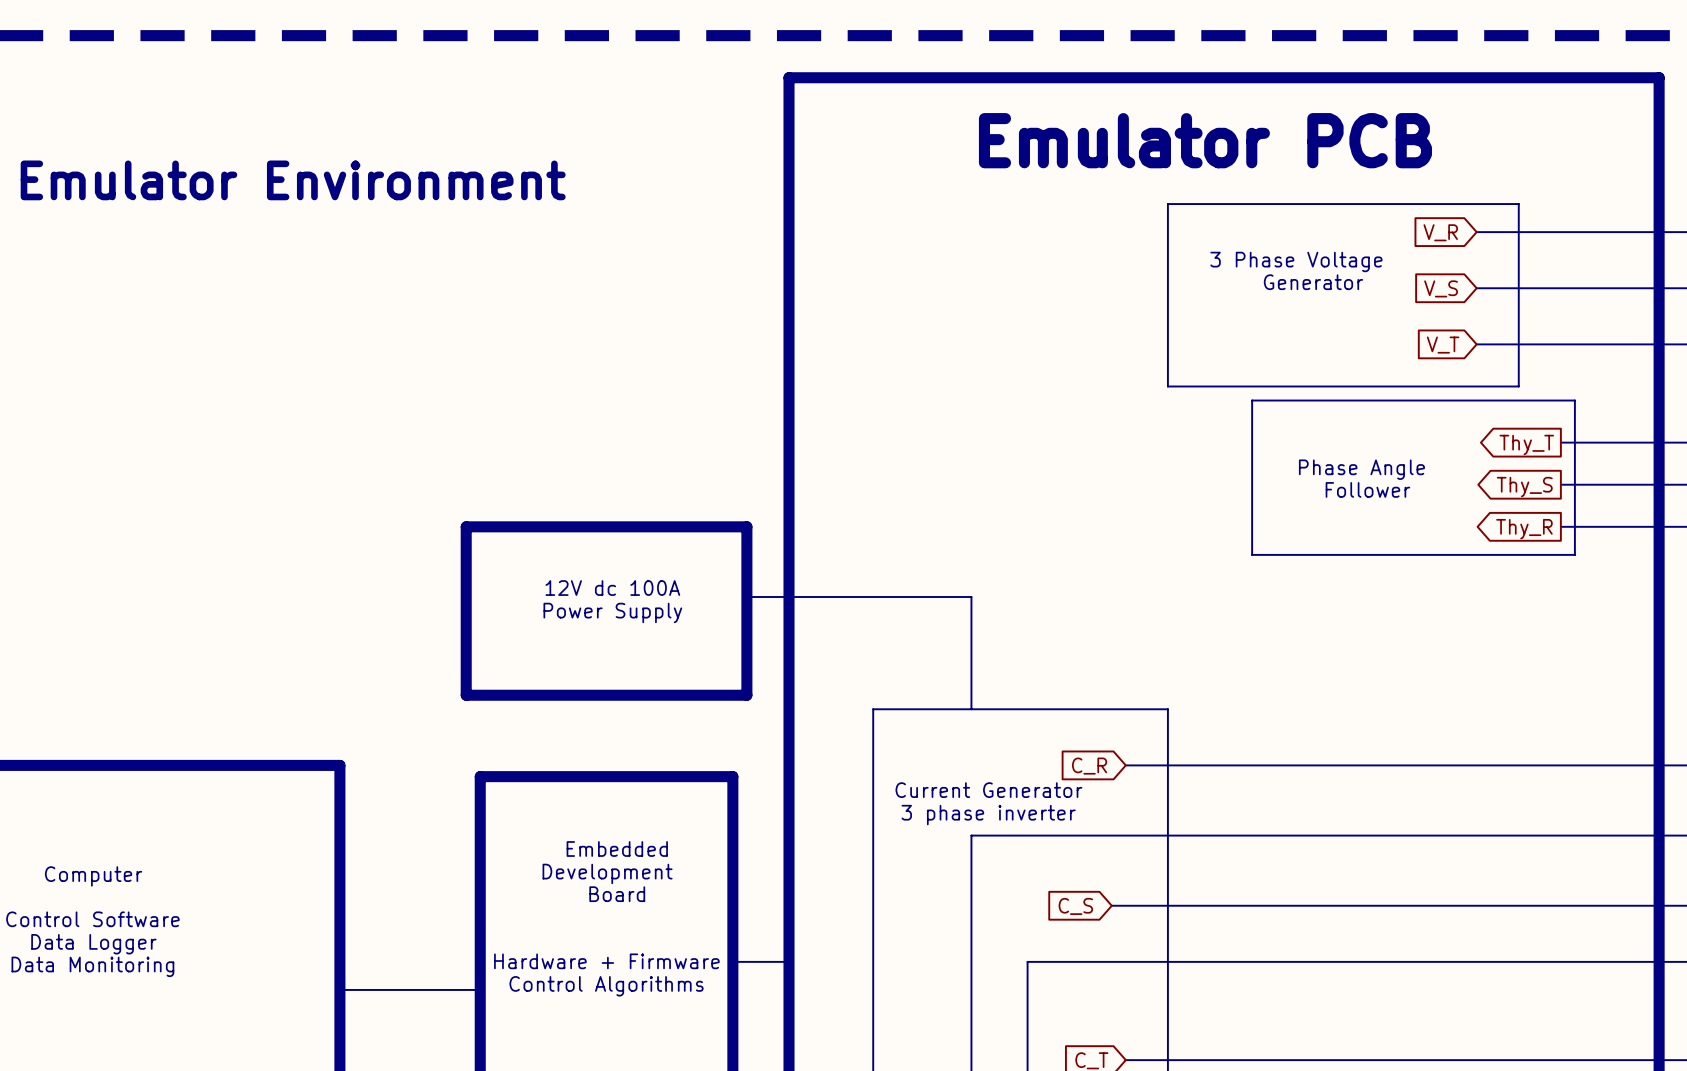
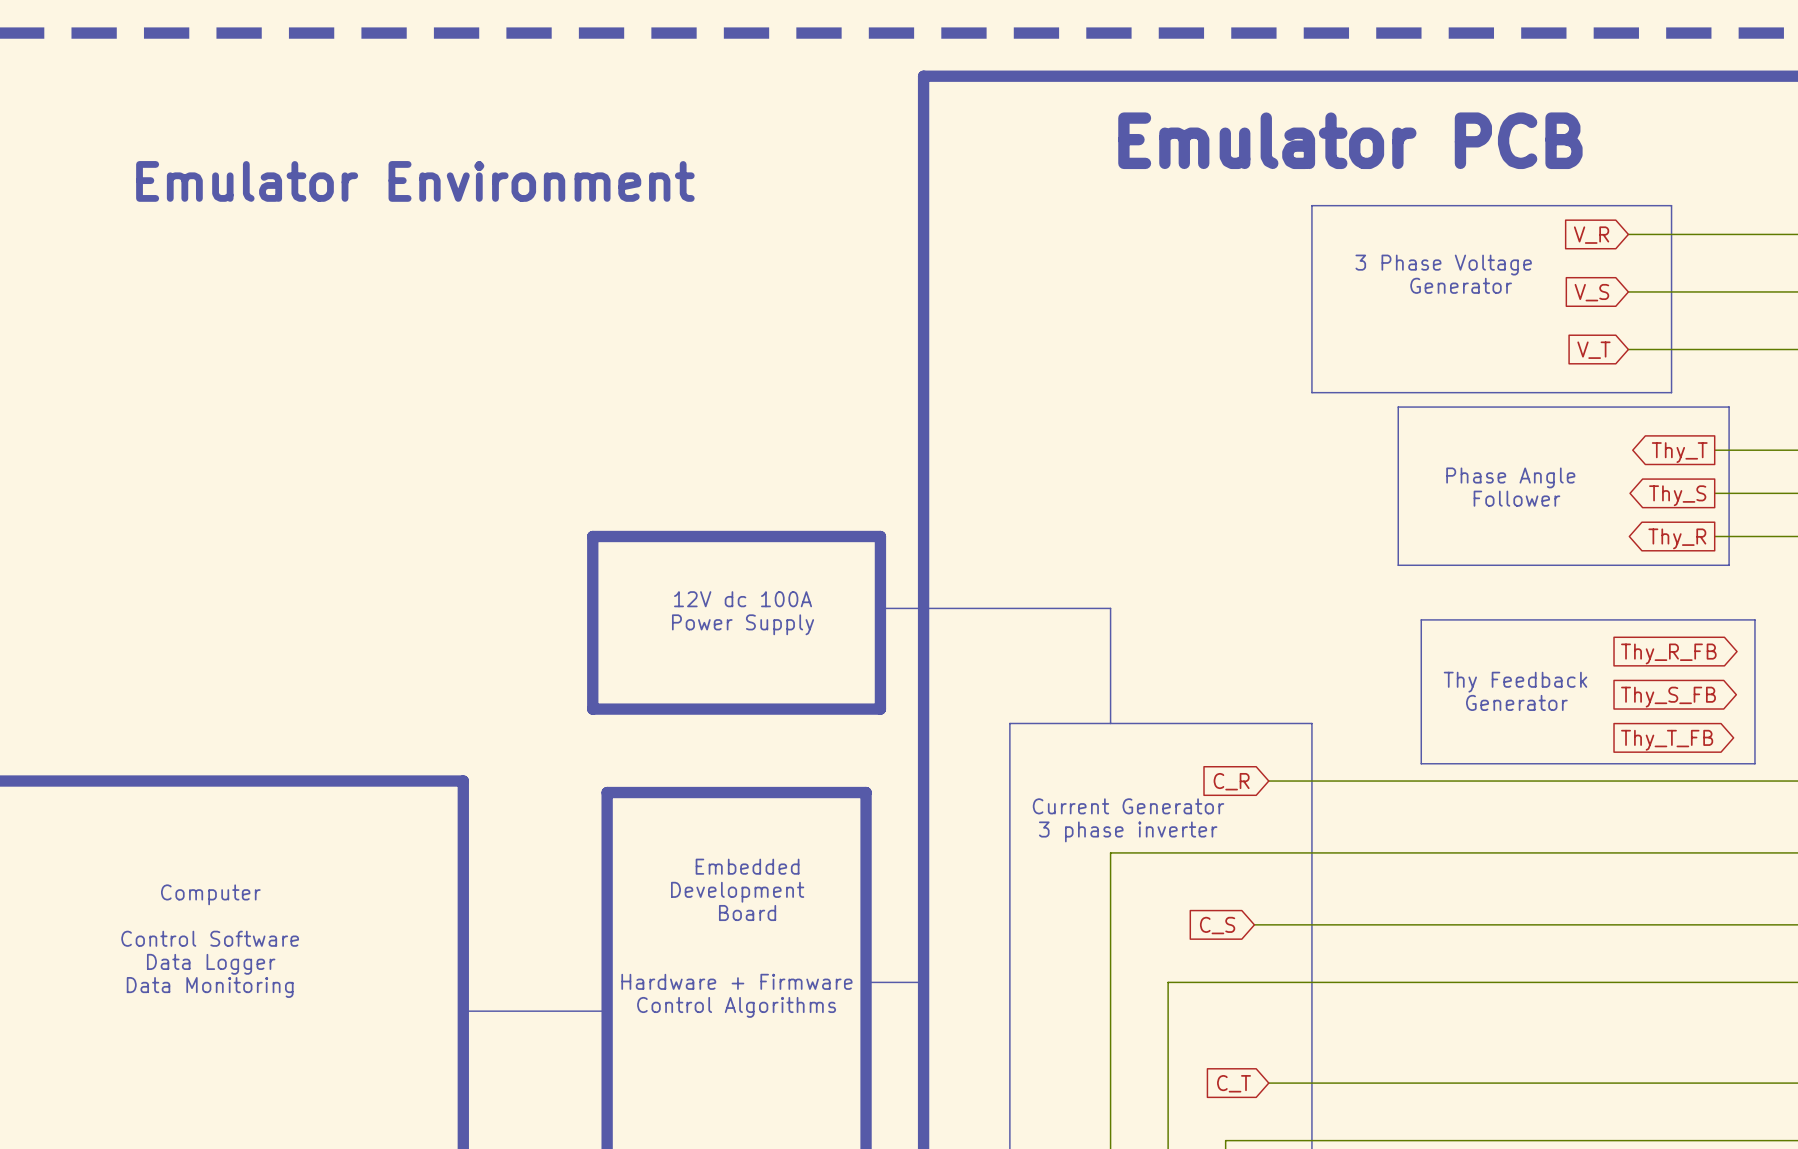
line: none -> (1421, 619) (1754, 619) (1754, 763) (1421, 763) (1421, 619)
global label: none -> Thy_R_FB (1668, 653)
text: none -> Thy Feedback (1515, 682)
global label: none -> Thy_S_FB (1668, 697)
text: none -> Generator (1516, 702)
global label: none -> Thy_T_FB (1667, 740)

